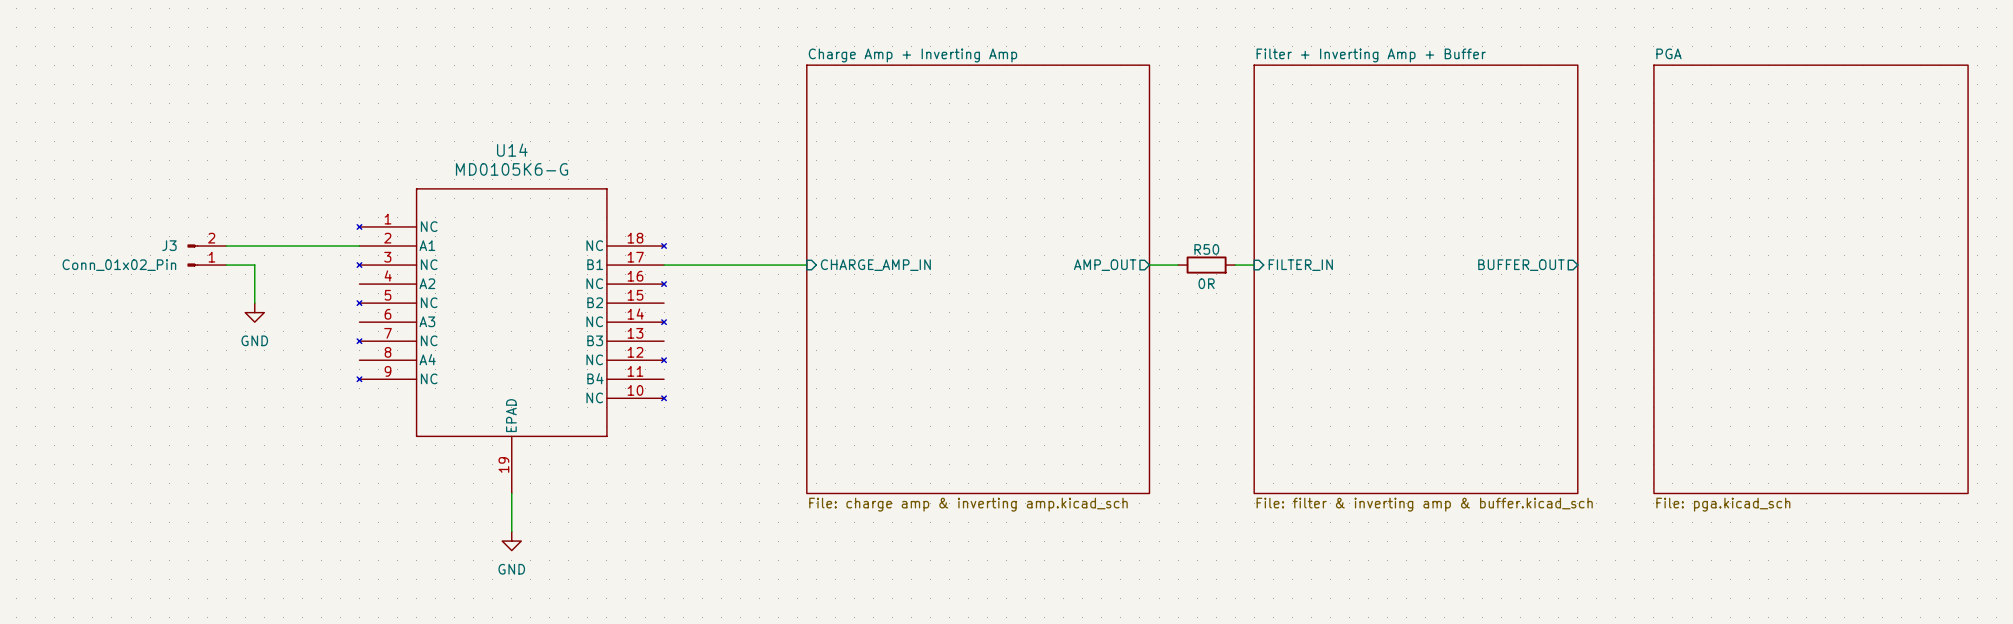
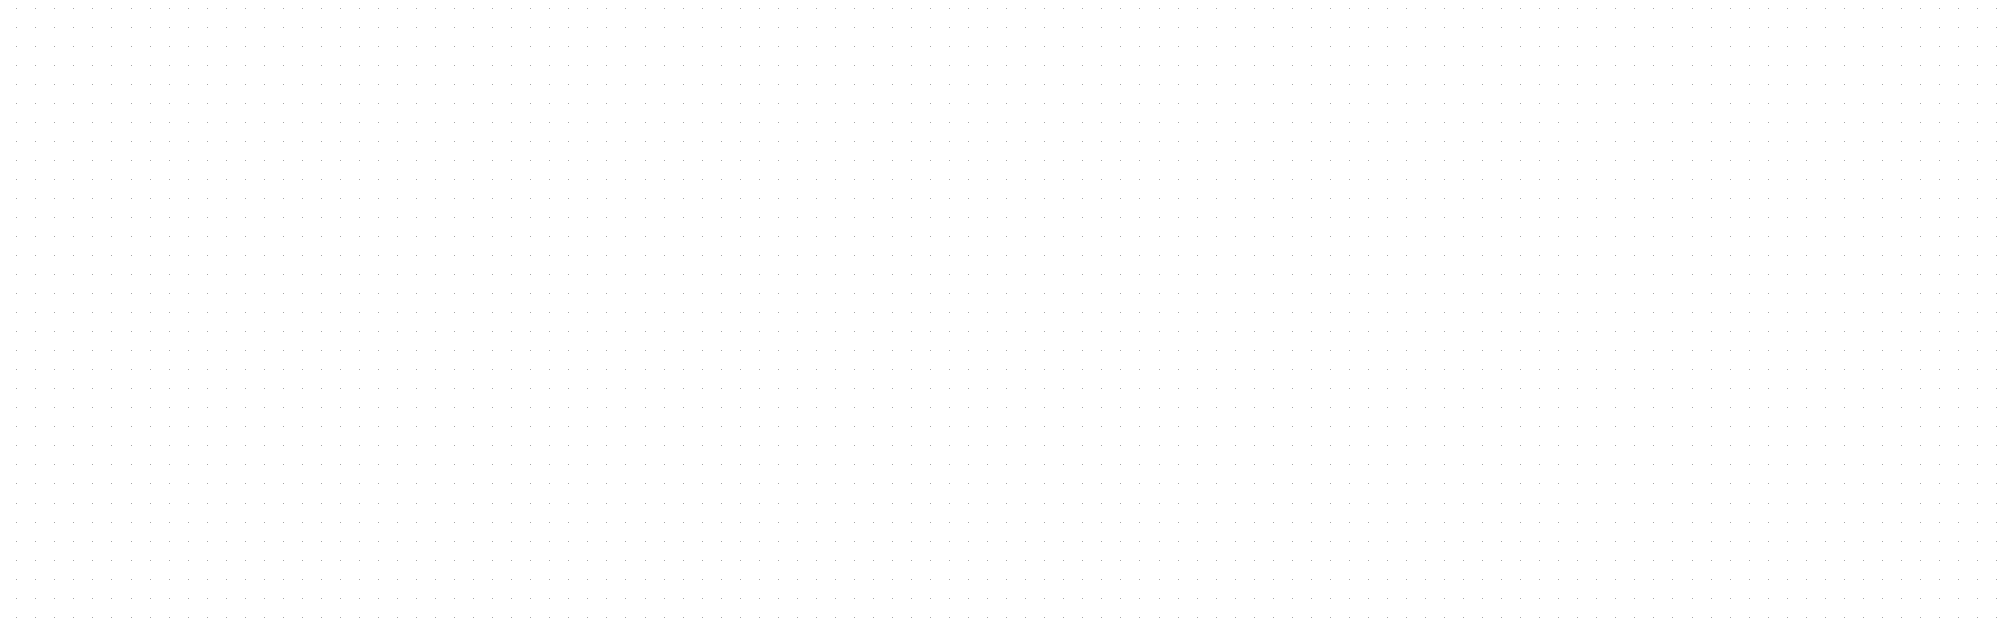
wire: (226, 246) (359, 246) -> none
J3: Conn_01x02_Pin (206, 255) -> none
wire: (226, 265) (254, 265) (254, 303) -> none
wire: (664, 265) (806, 265) -> none
sheet pin: CHARGE_AMP_IN (875, 265) -> none
sheet pin: AMP_OUT (1105, 265) -> none
wire: (1149, 265) (1178, 265) -> none
R50: 0R (1206, 265) -> none
wire: (1235, 265) (1254, 265) -> none
sheet pin: FILTER_IN (1300, 265) -> none
sheet pin: BUFFER_OUT (1521, 265) -> none
sheet Charge Amp + Inverting Amp: File: charge amp & inverting amp.kicad_sch (978, 279) -> none
sheet Filter + Inverting Amp + Buffer: File: filter & inverting amp & buffer.kicad_sch (1415, 279) -> none
sheet PGA: File: pga.kicad_sch (1811, 279) -> none
power symbol: GND (254, 312) -> none
U14: MD0105K6-G (511, 340) -> none
wire: (511, 493) (511, 531) -> none
power symbol: GND (511, 541) -> none

